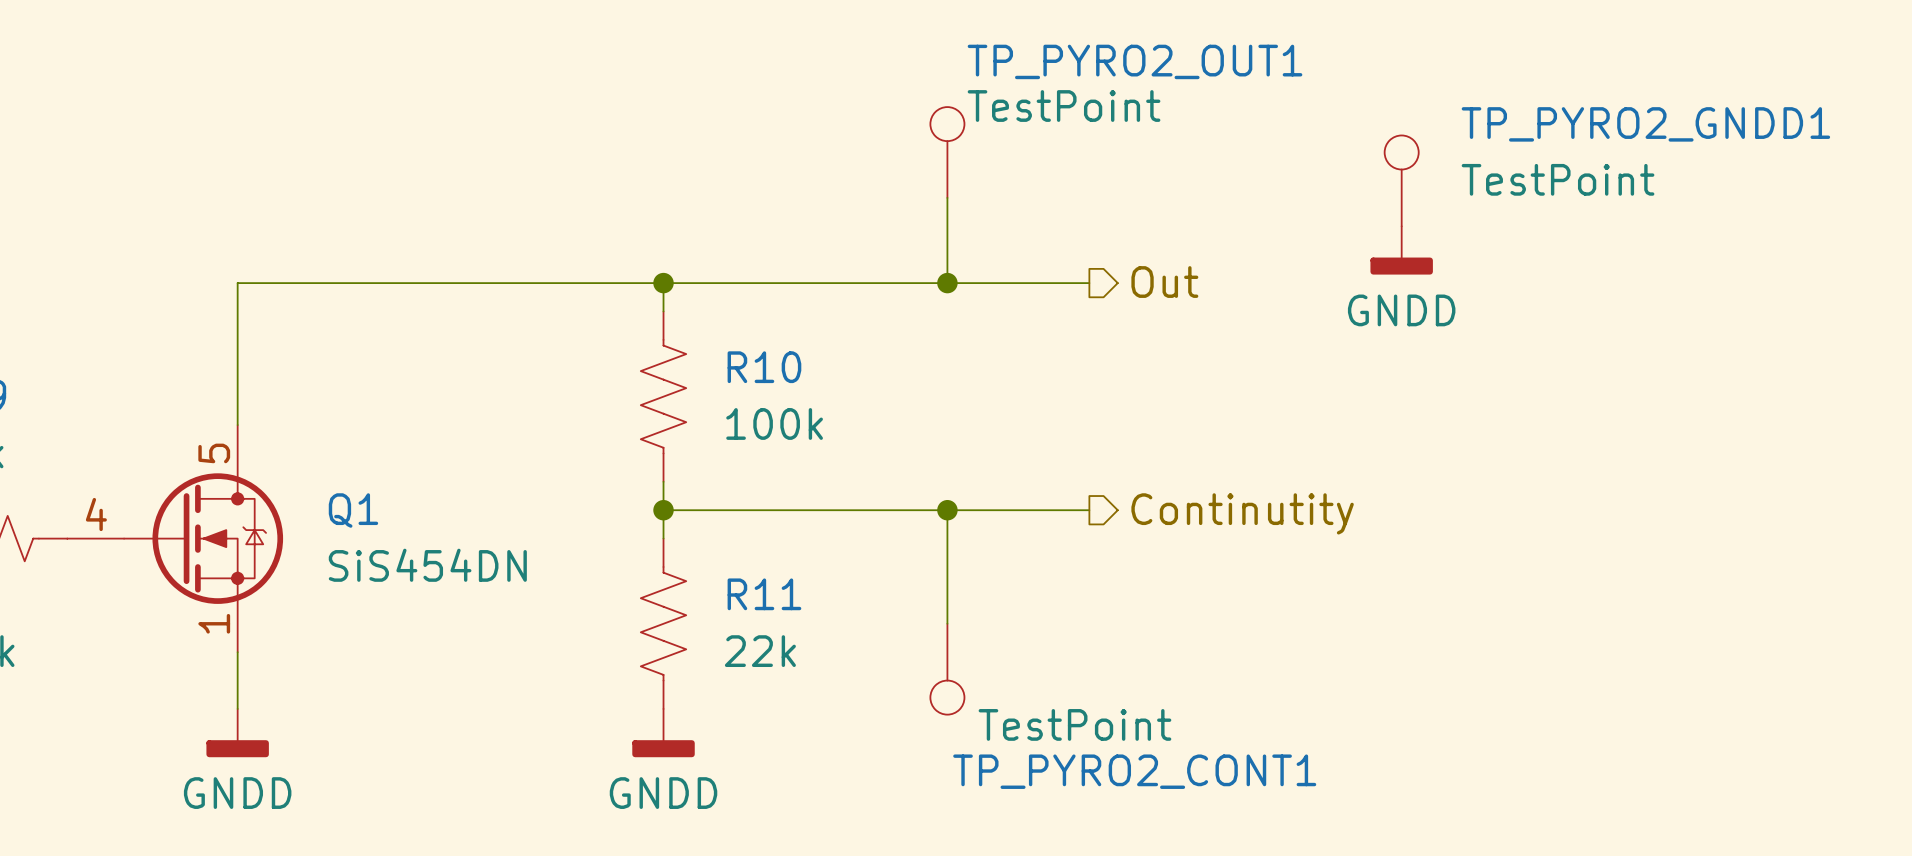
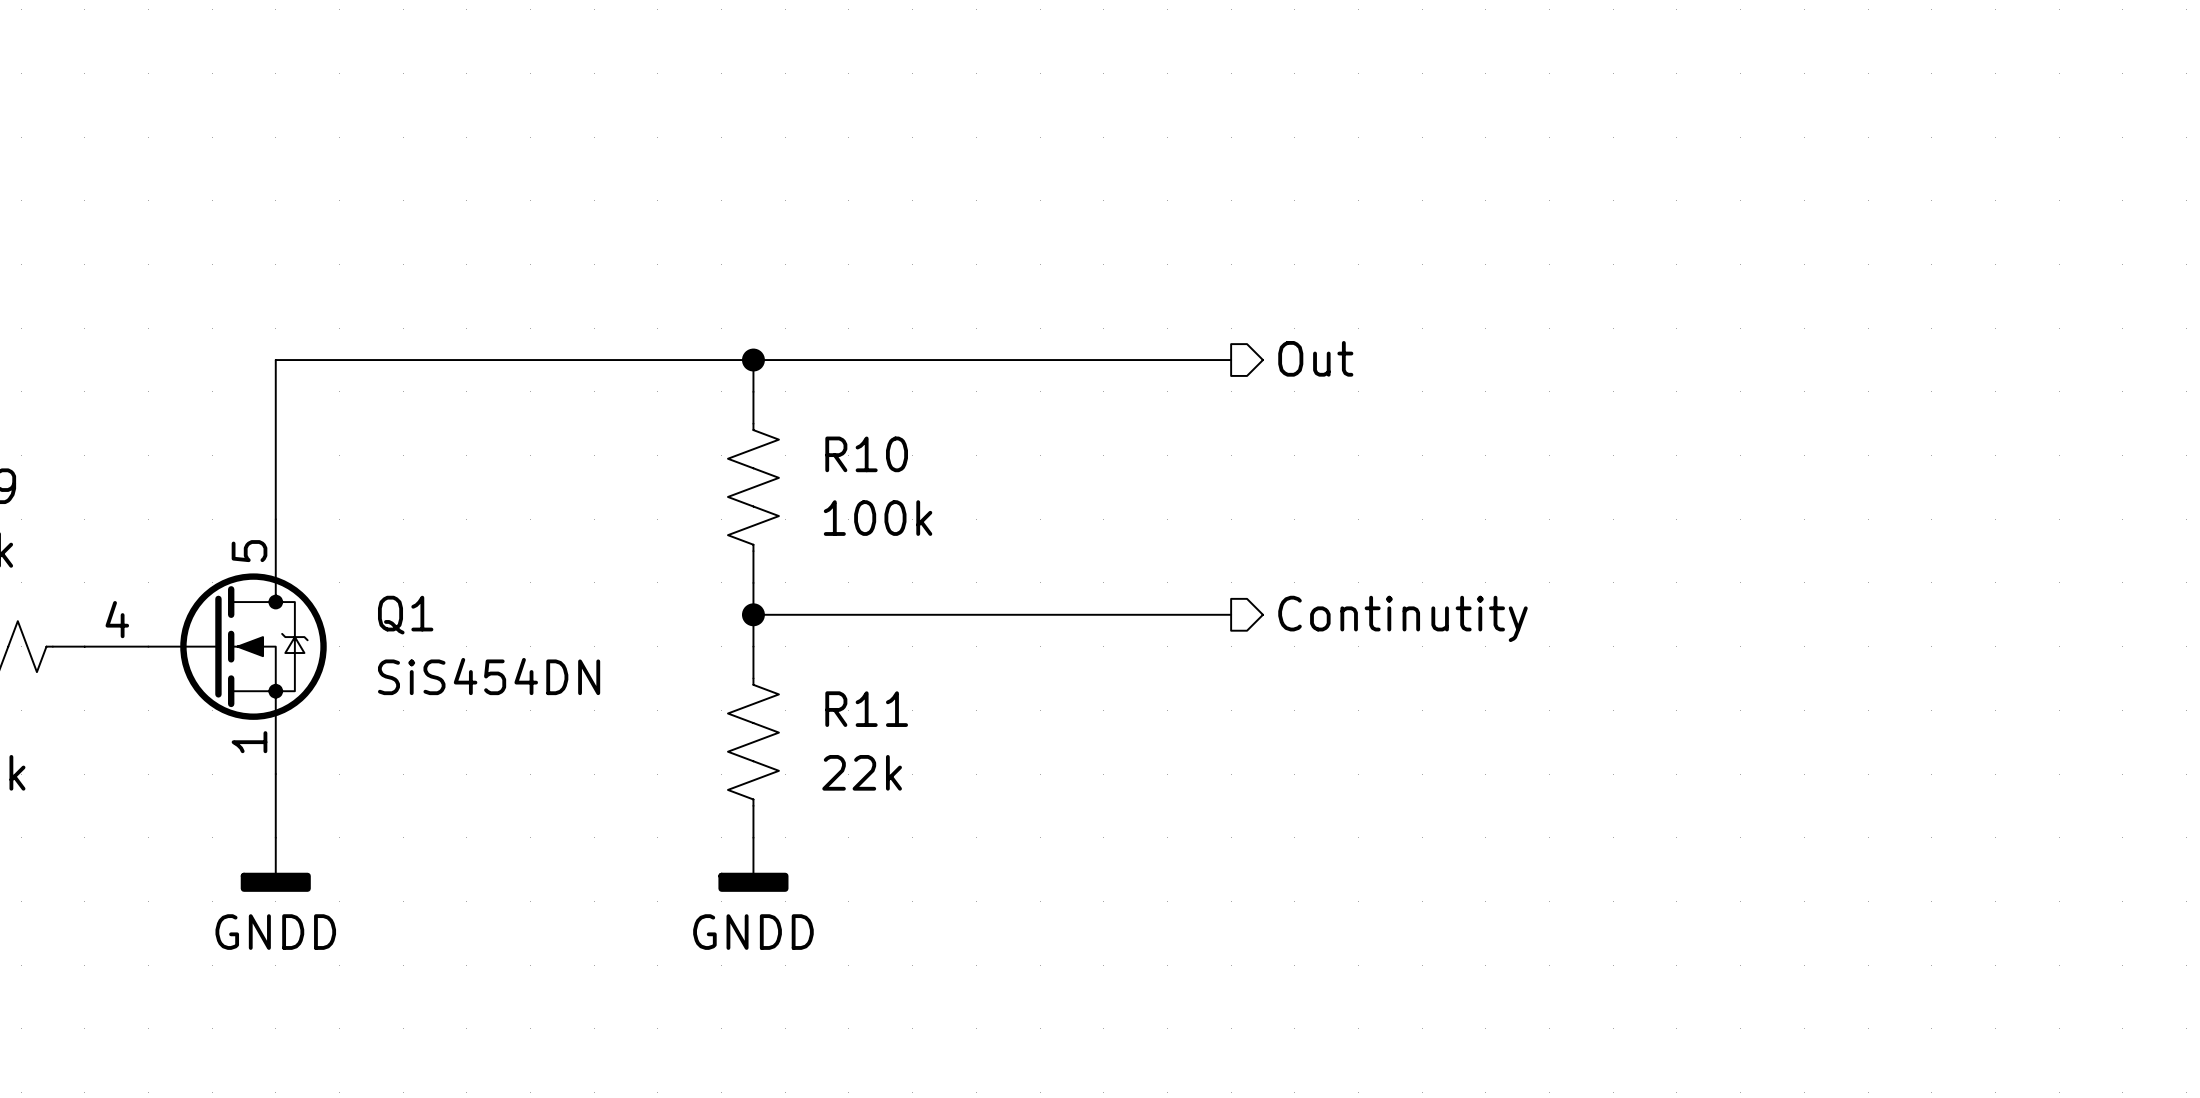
TP_PYRO2_OUT1: TestPoint (947, 152) -> none
TP_PYRO2_GNDD1: TestPoint (1401, 180) -> none
wire: (947, 197) (947, 283) -> none
power symbol: GNDD (1401, 250) -> none
junction: (947, 283) -> none
wire: (947, 510) (947, 623) -> none
junction: (947, 510) -> none
TP_PYRO2_CONT1: TestPoint (947, 669) -> none

